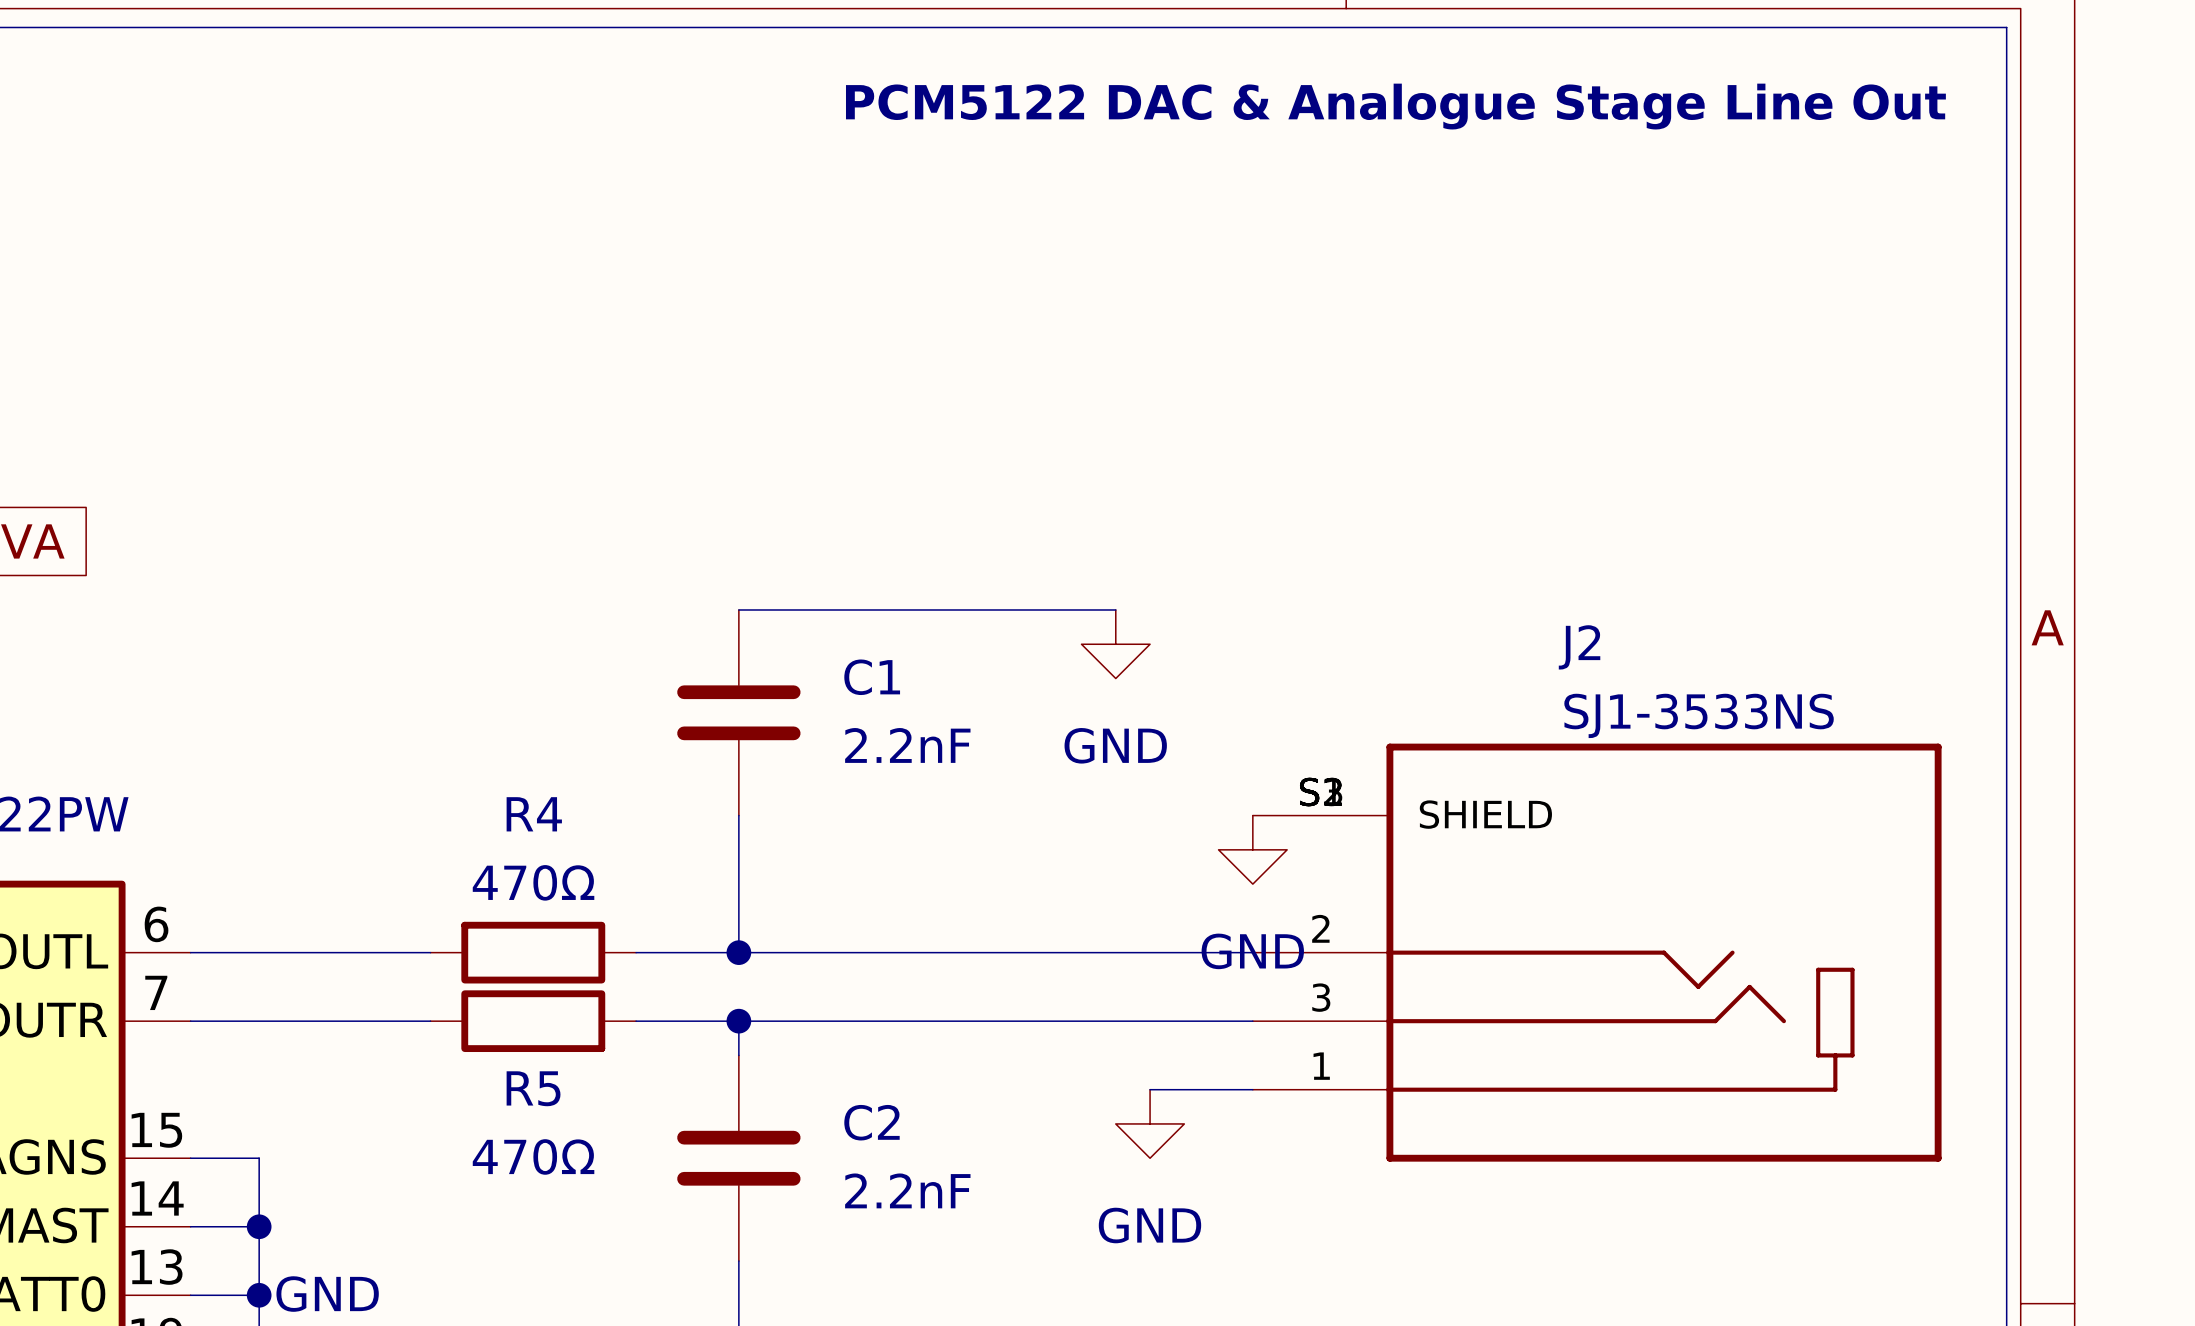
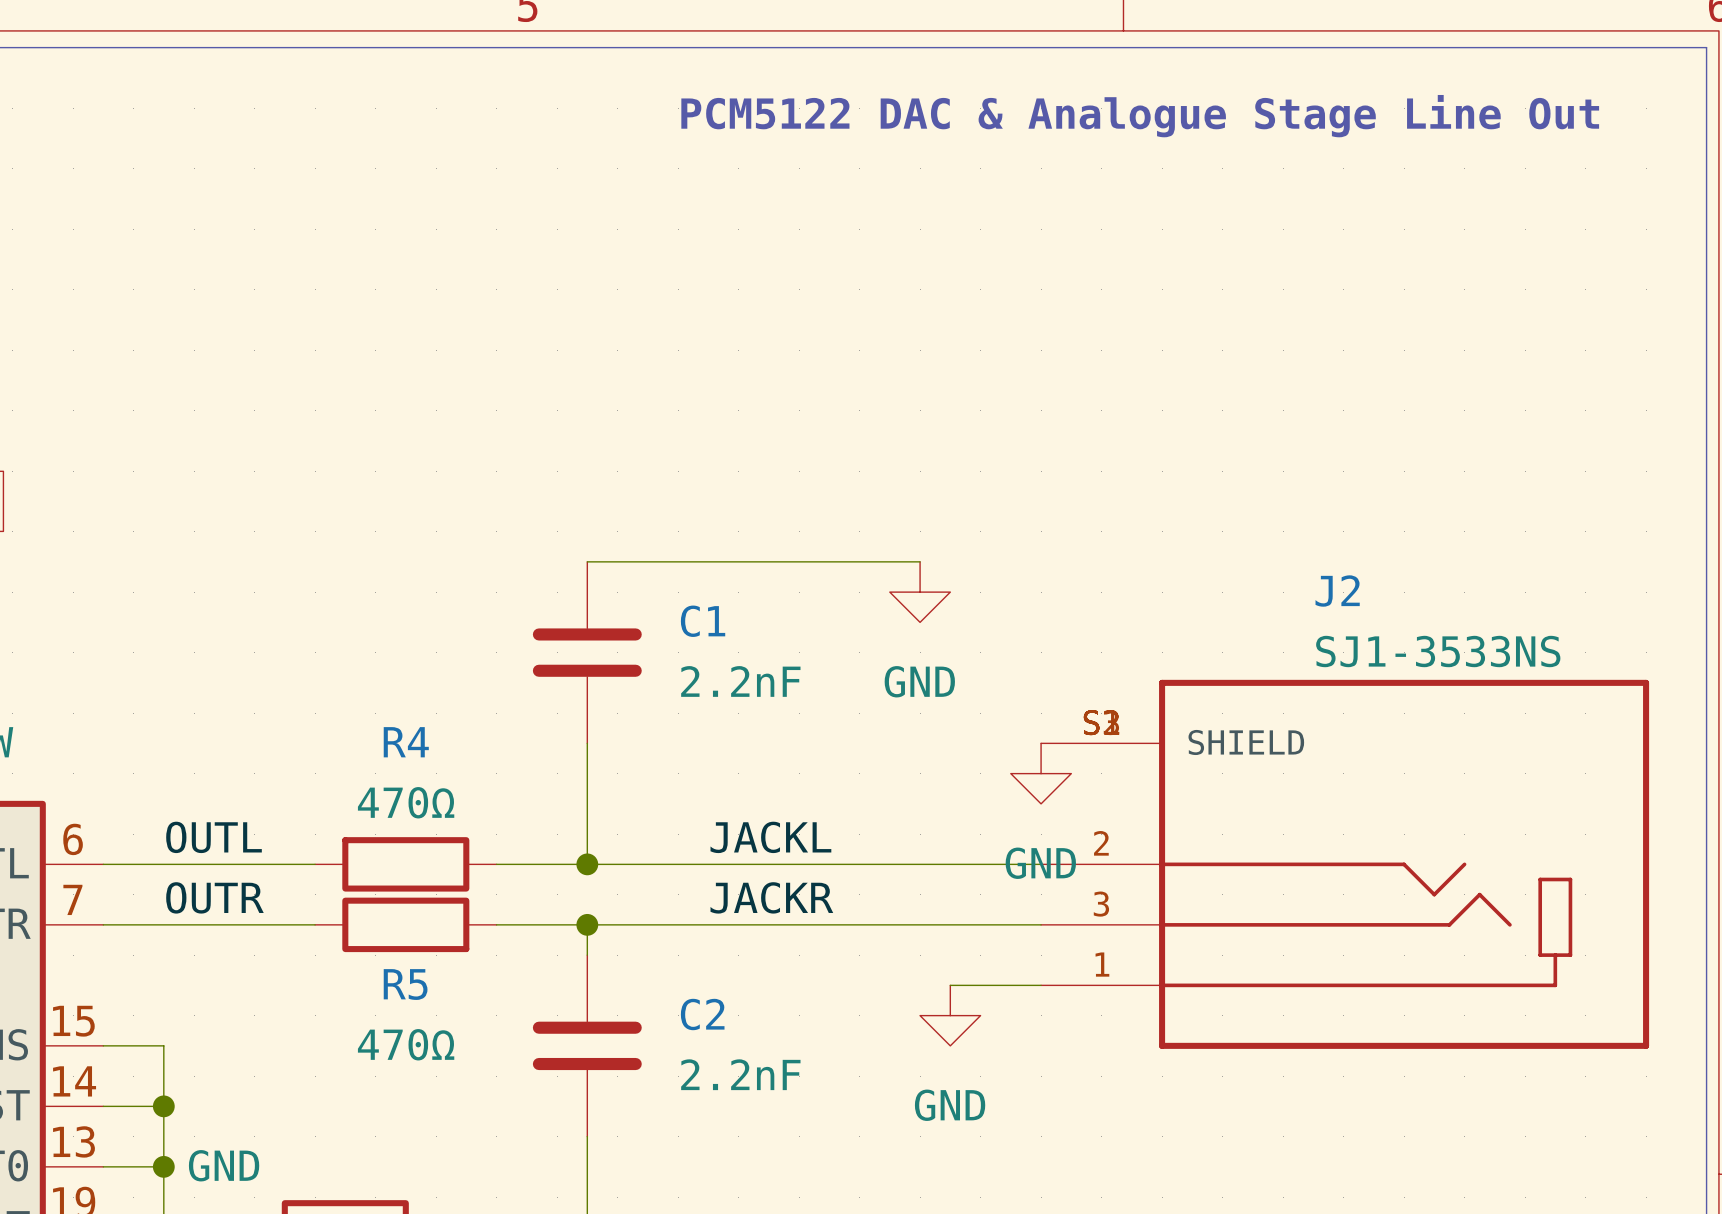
label: none -> OUTL (214, 837)
label: none -> JACKL (770, 837)
label: none -> OUTR (214, 897)
label: none -> JACKR (771, 897)

